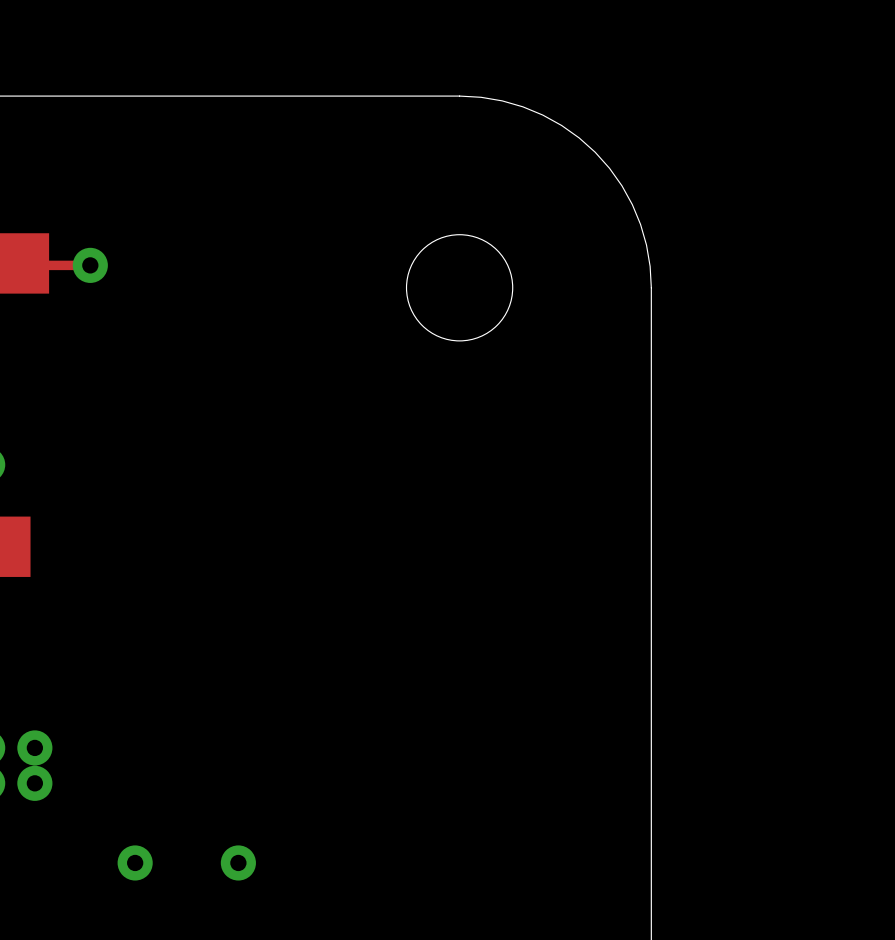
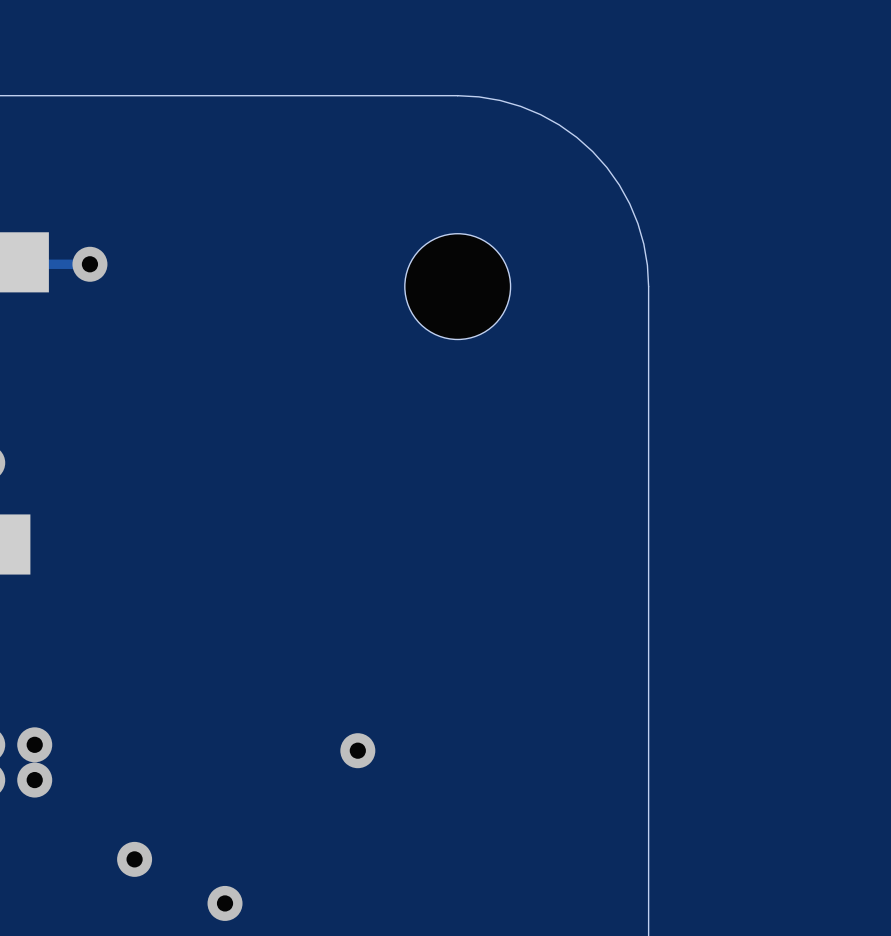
via: none -> (357, 750)
via position: (238, 862) -> (225, 903)

